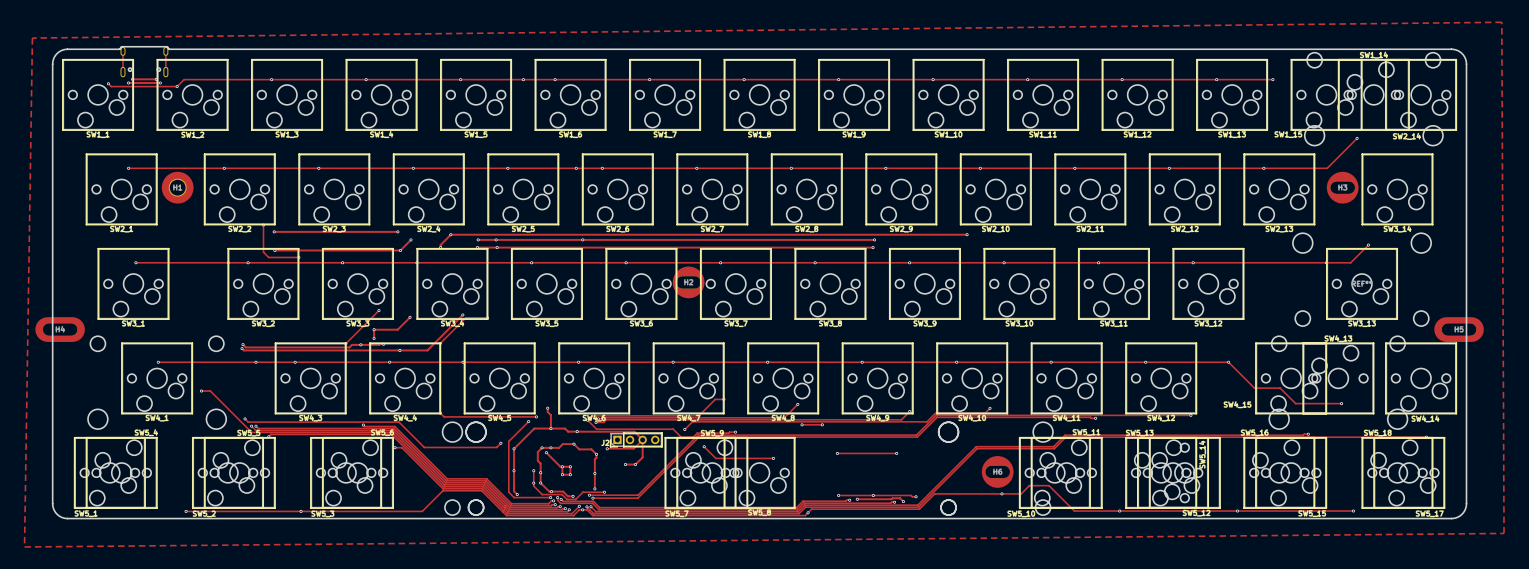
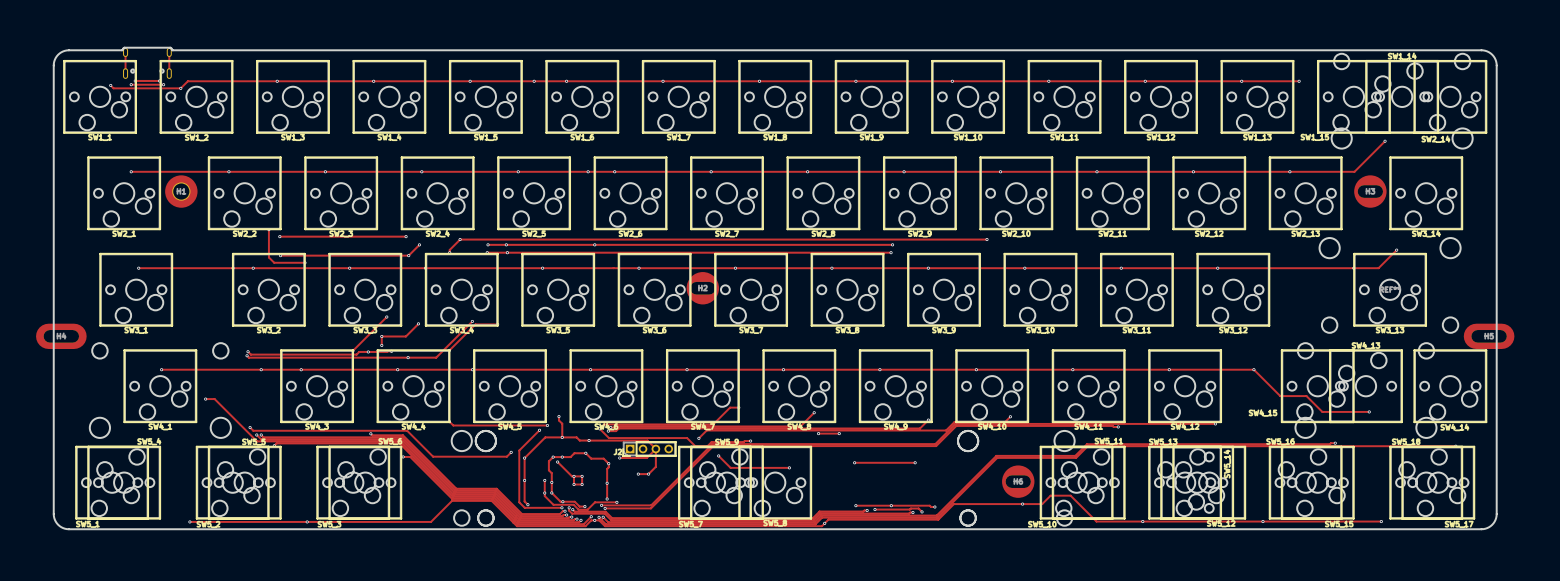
zone outline: (1501, 22) (1504, 533) (24, 546) (32, 38) (1501, 22) -> none

